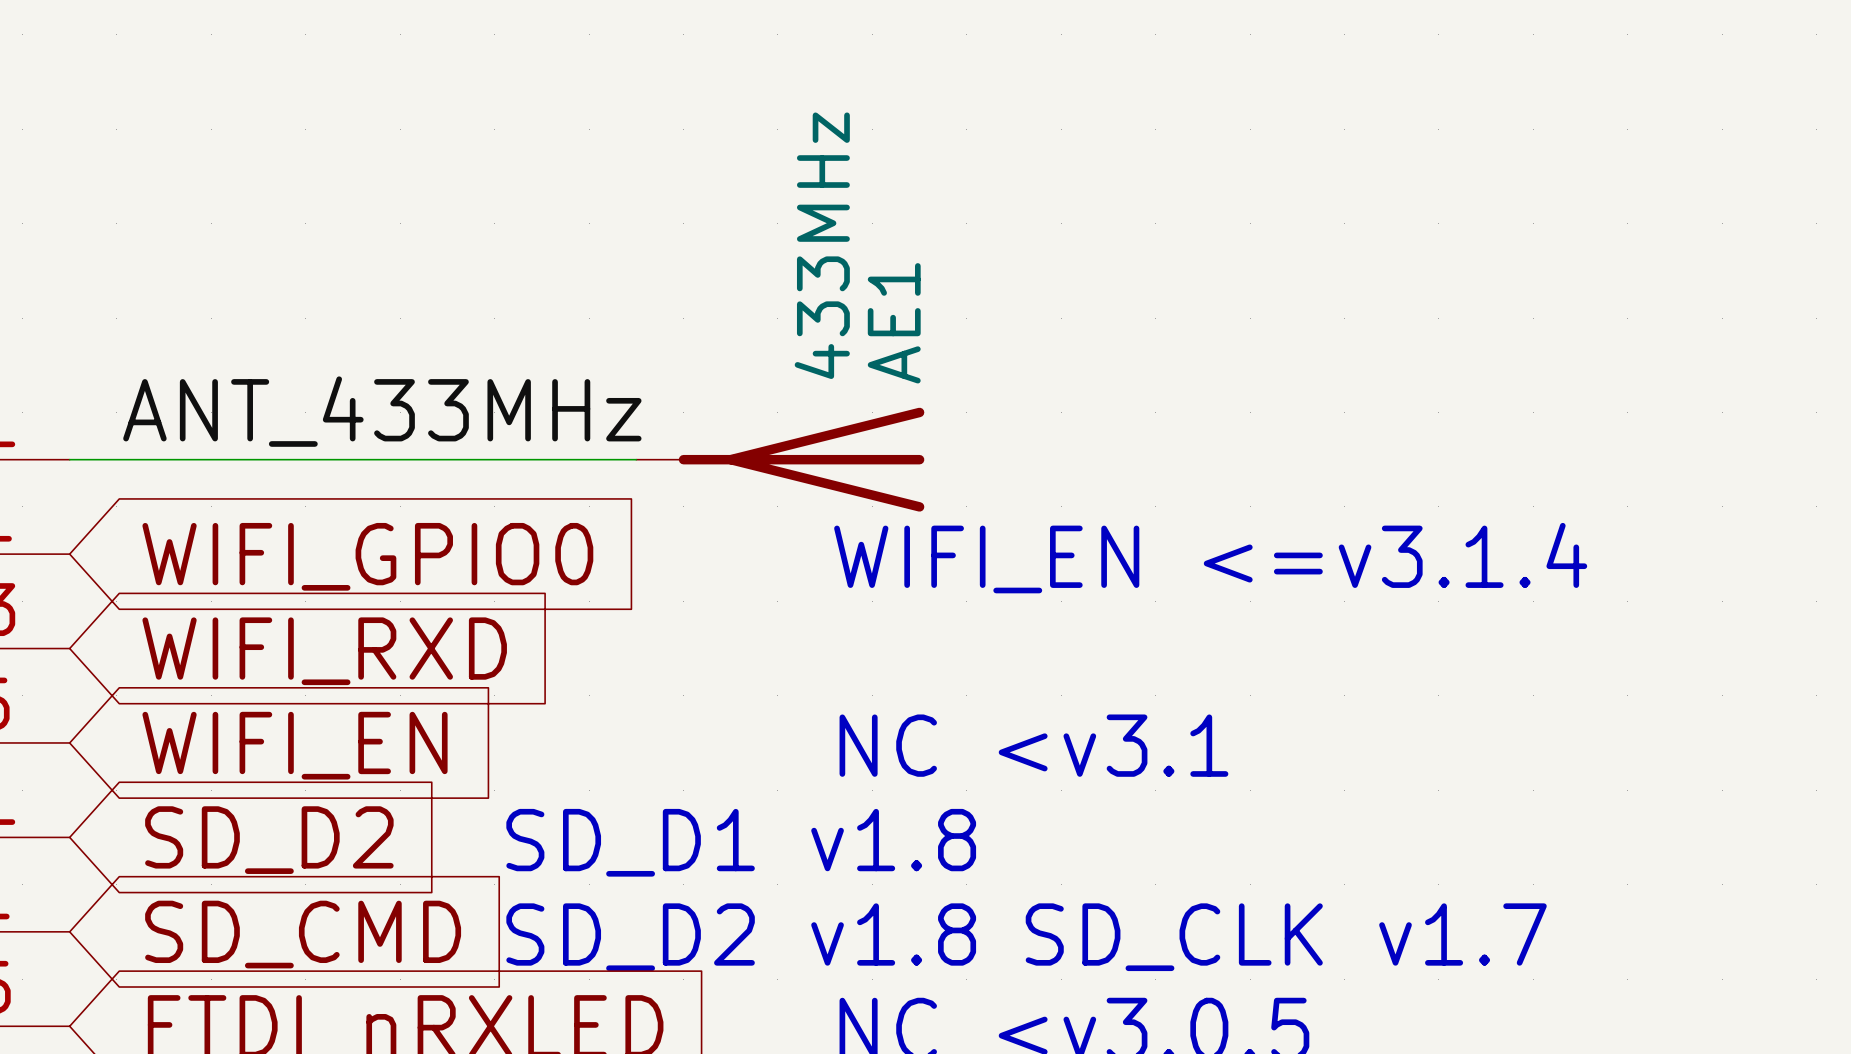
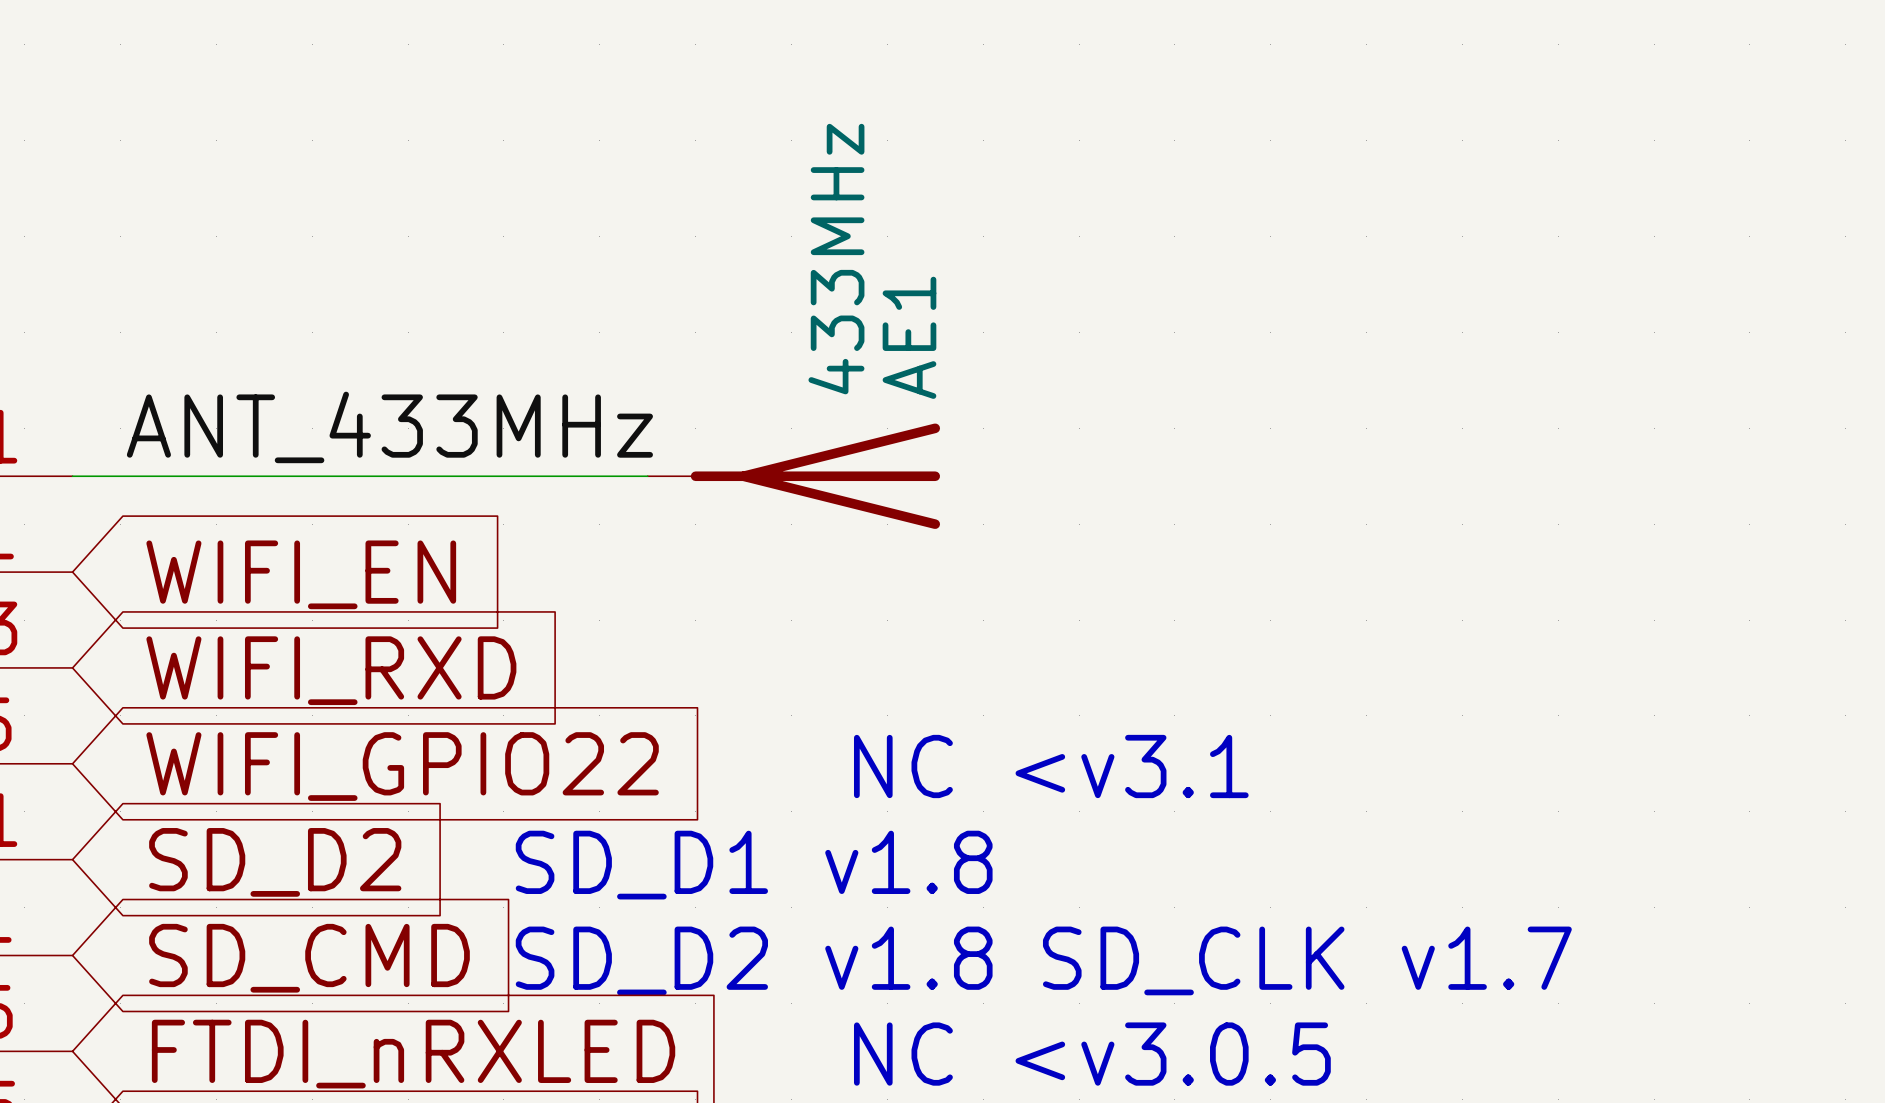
global label: WIFI_GPIO0 (367, 556) -> WIFI_EN (301, 574)
text: WIFI_EN <=v3.1.4 (1210, 558) -> none
global label: WIFI_EN (295, 745) -> WIFI_GPIO22 (402, 766)

